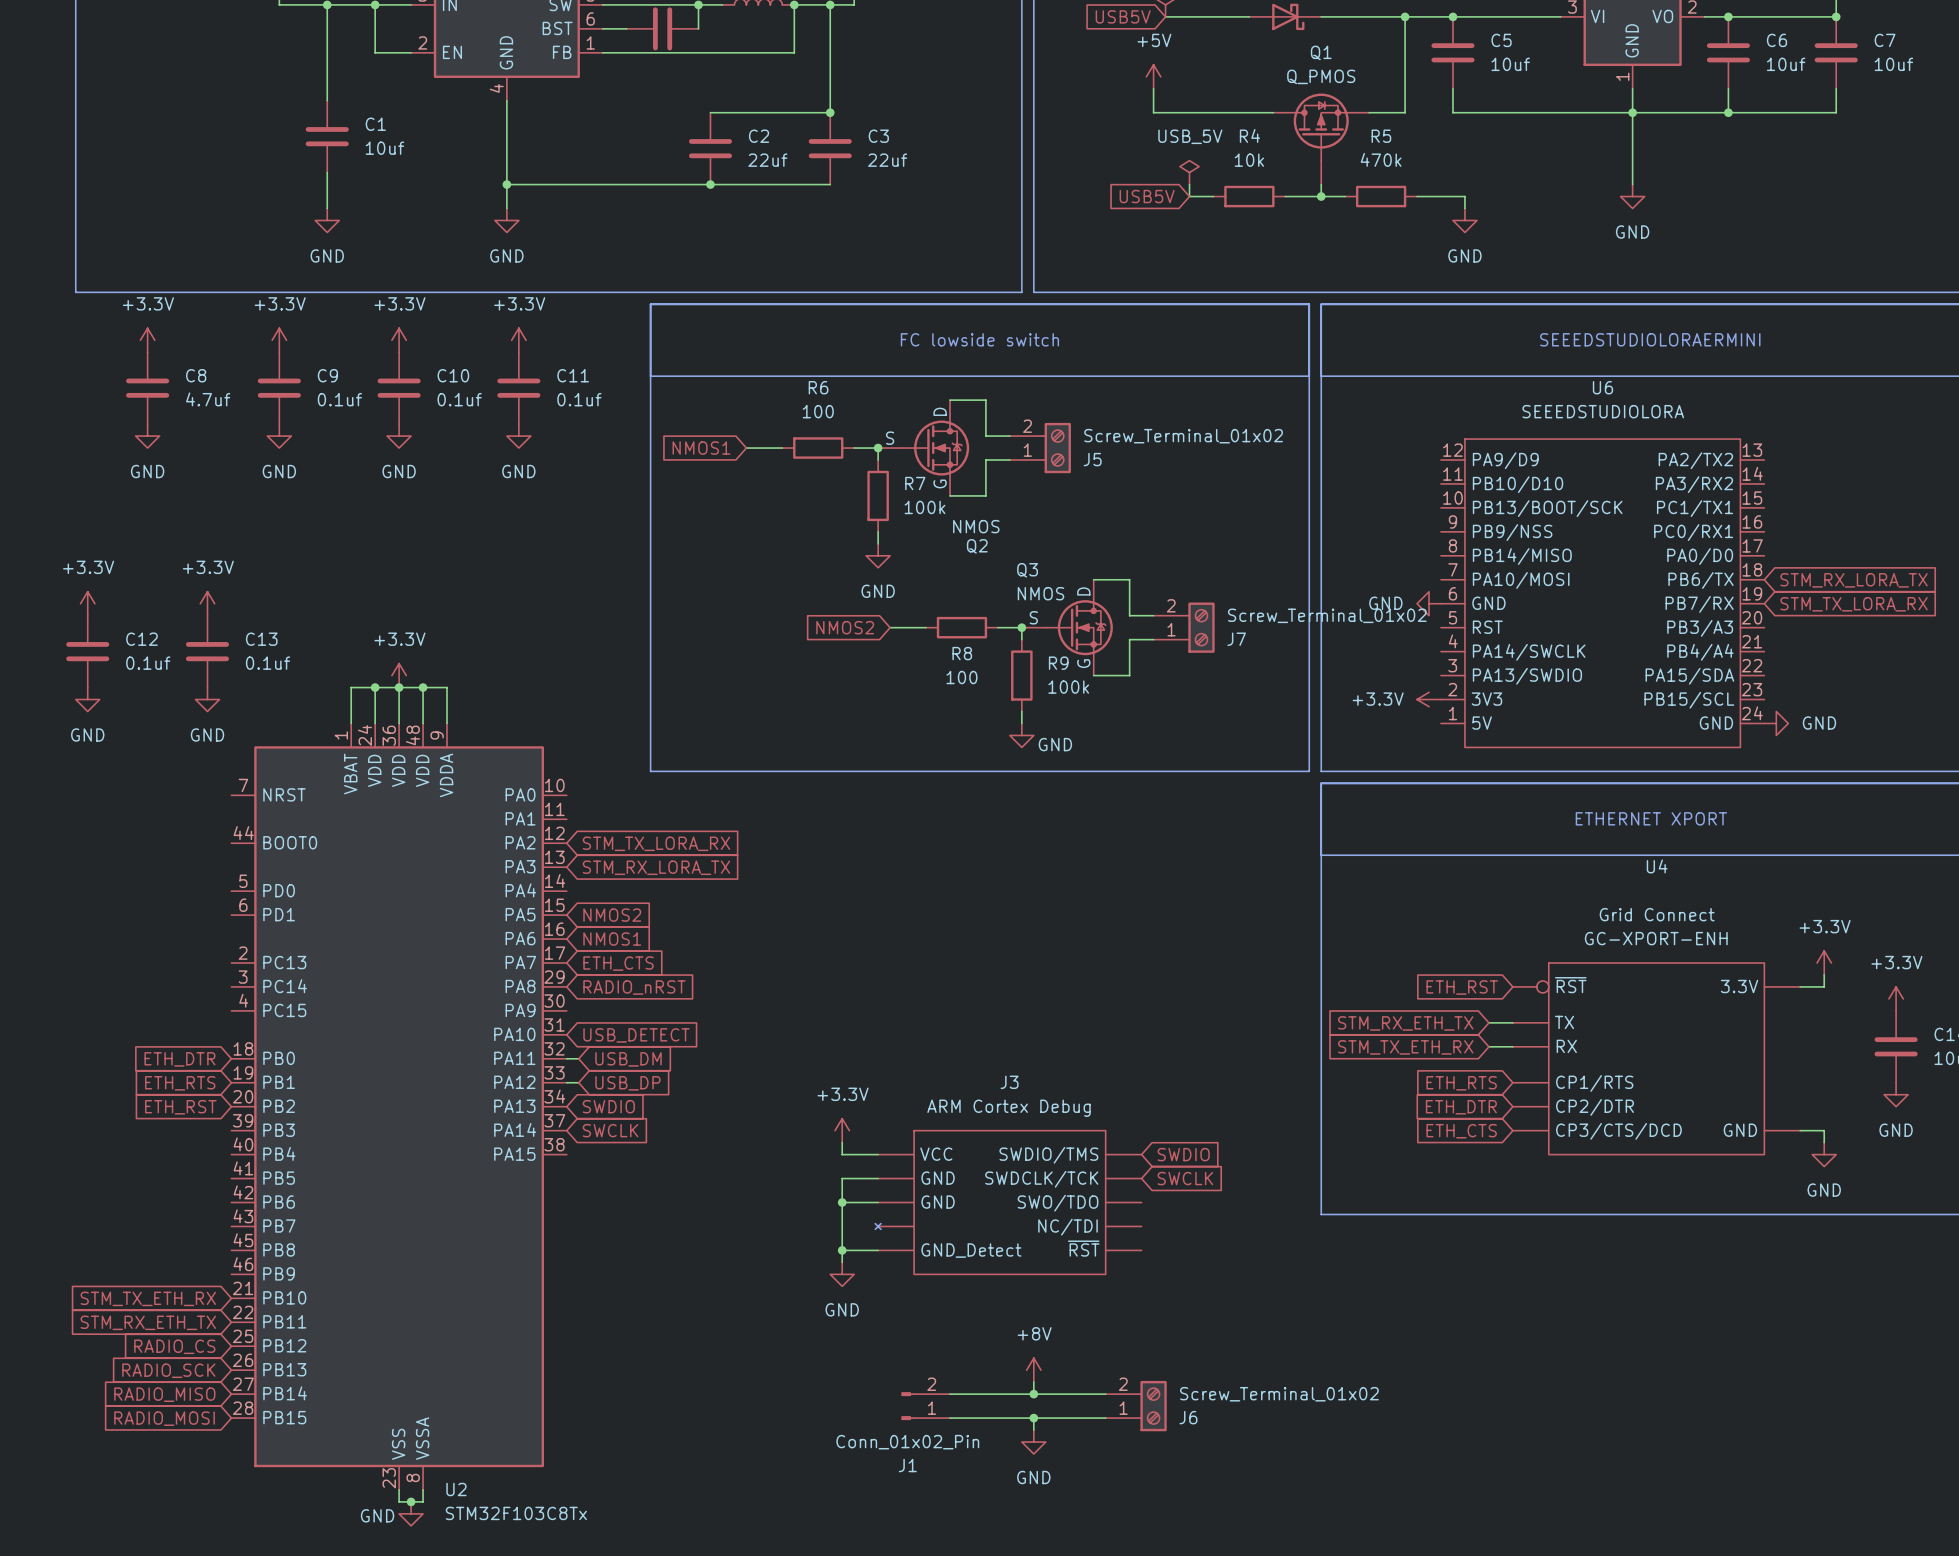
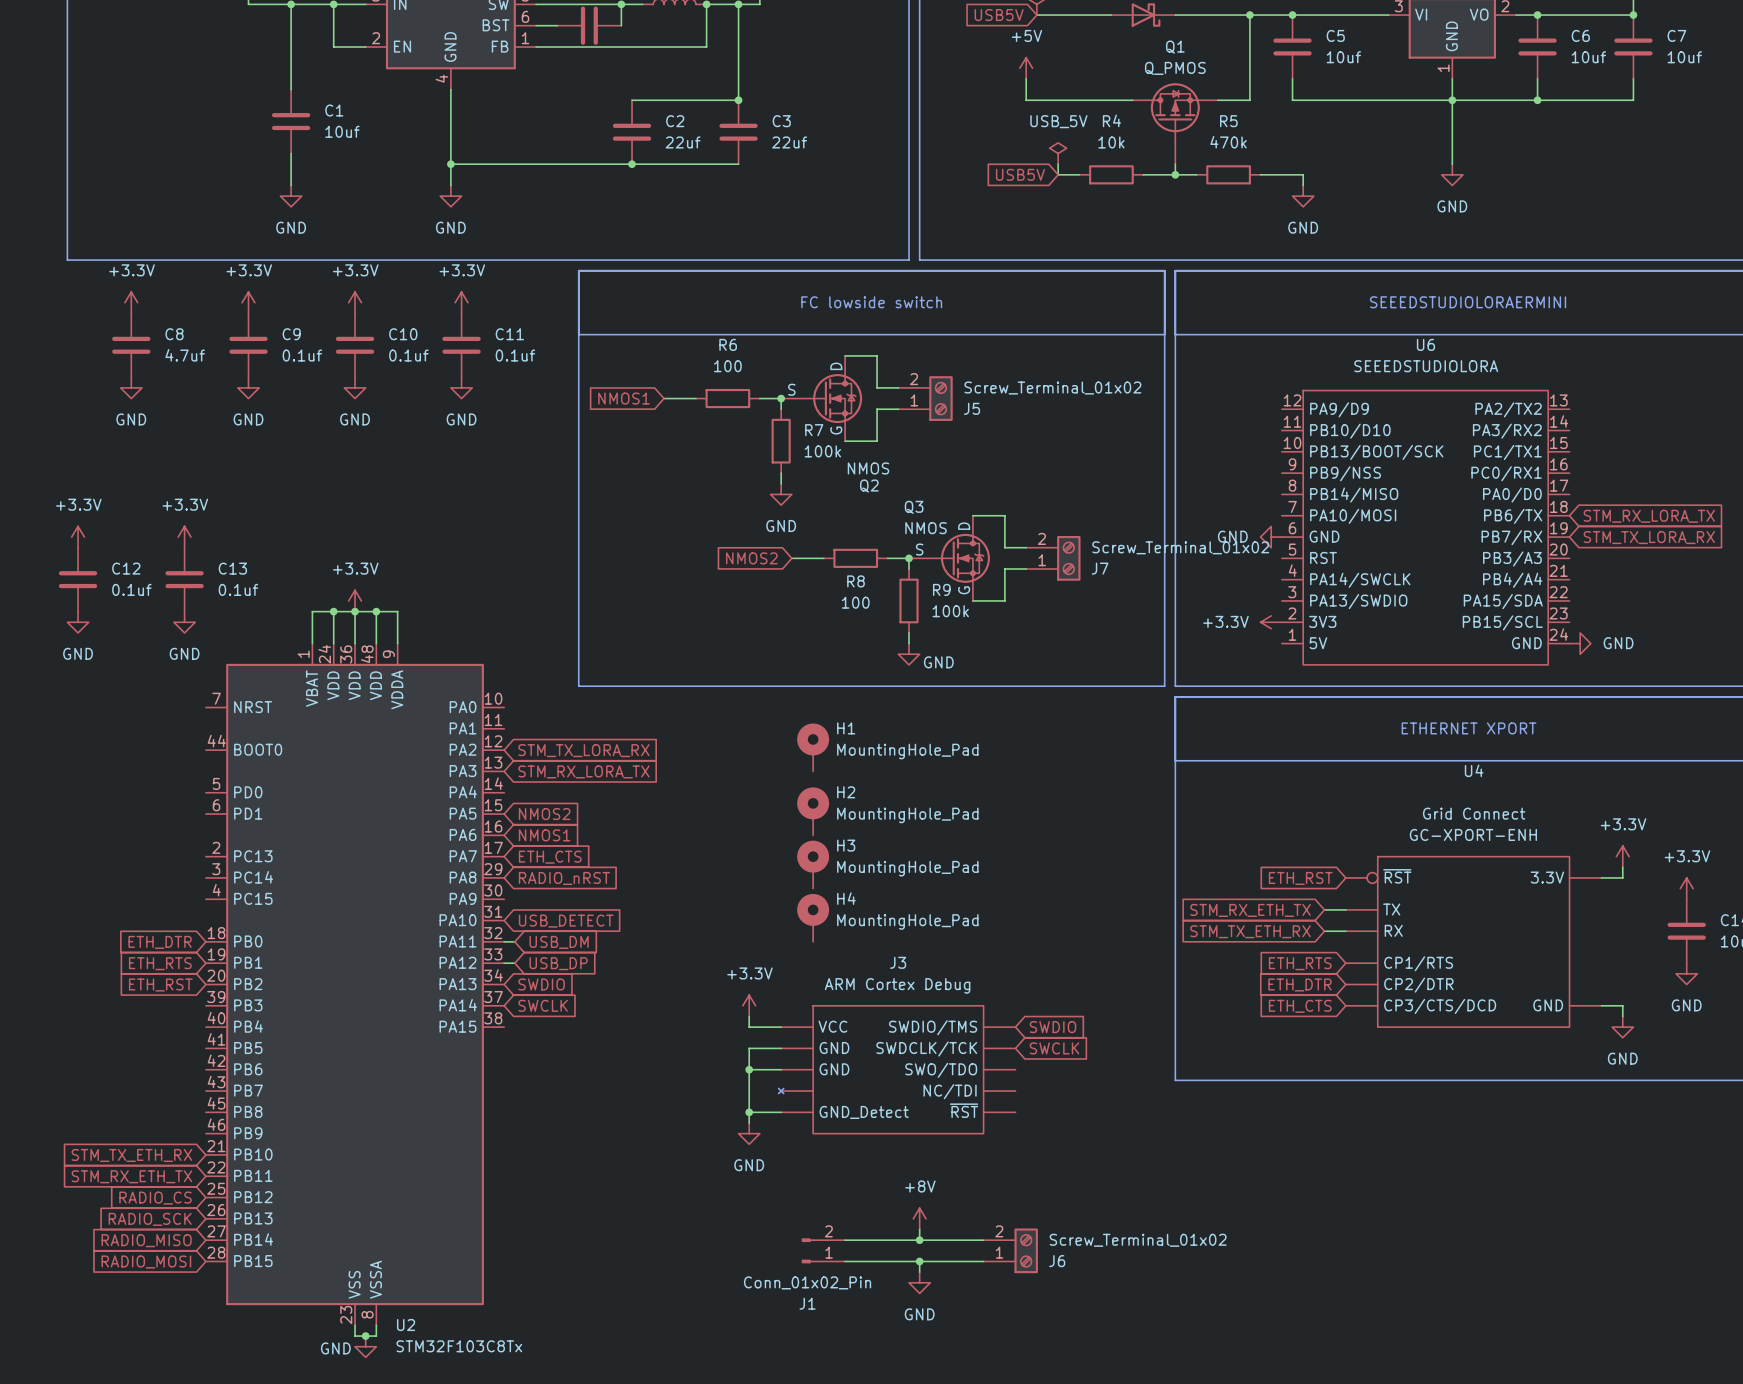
H1: none -> MountingHole_Pad (813, 747)
H2: none -> MountingHole_Pad (813, 811)
H3: none -> MountingHole_Pad (813, 864)
H4: none -> MountingHole_Pad (813, 917)

